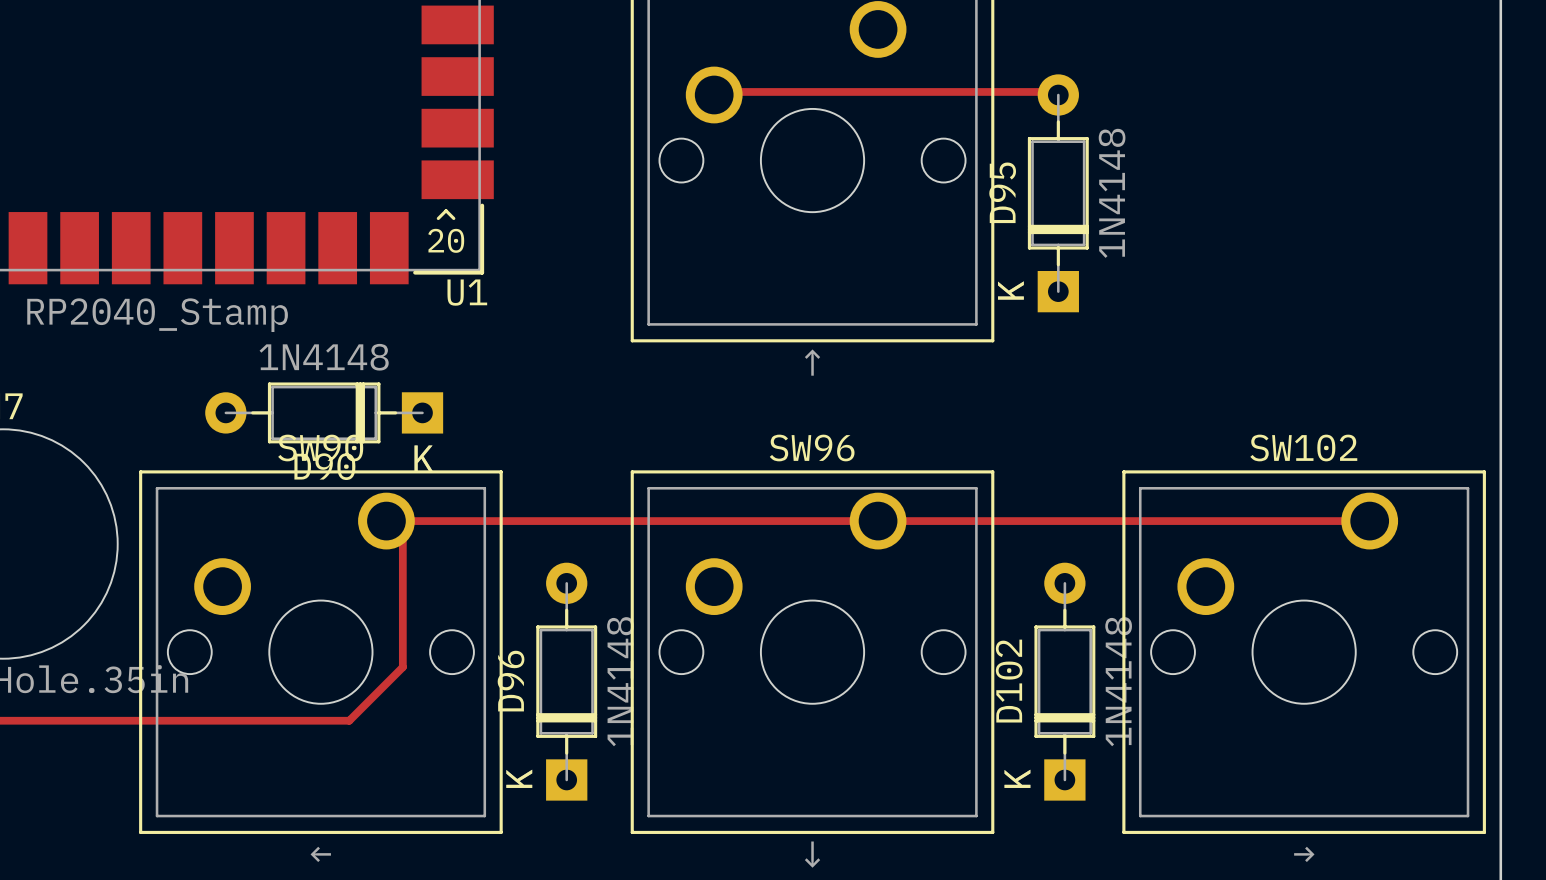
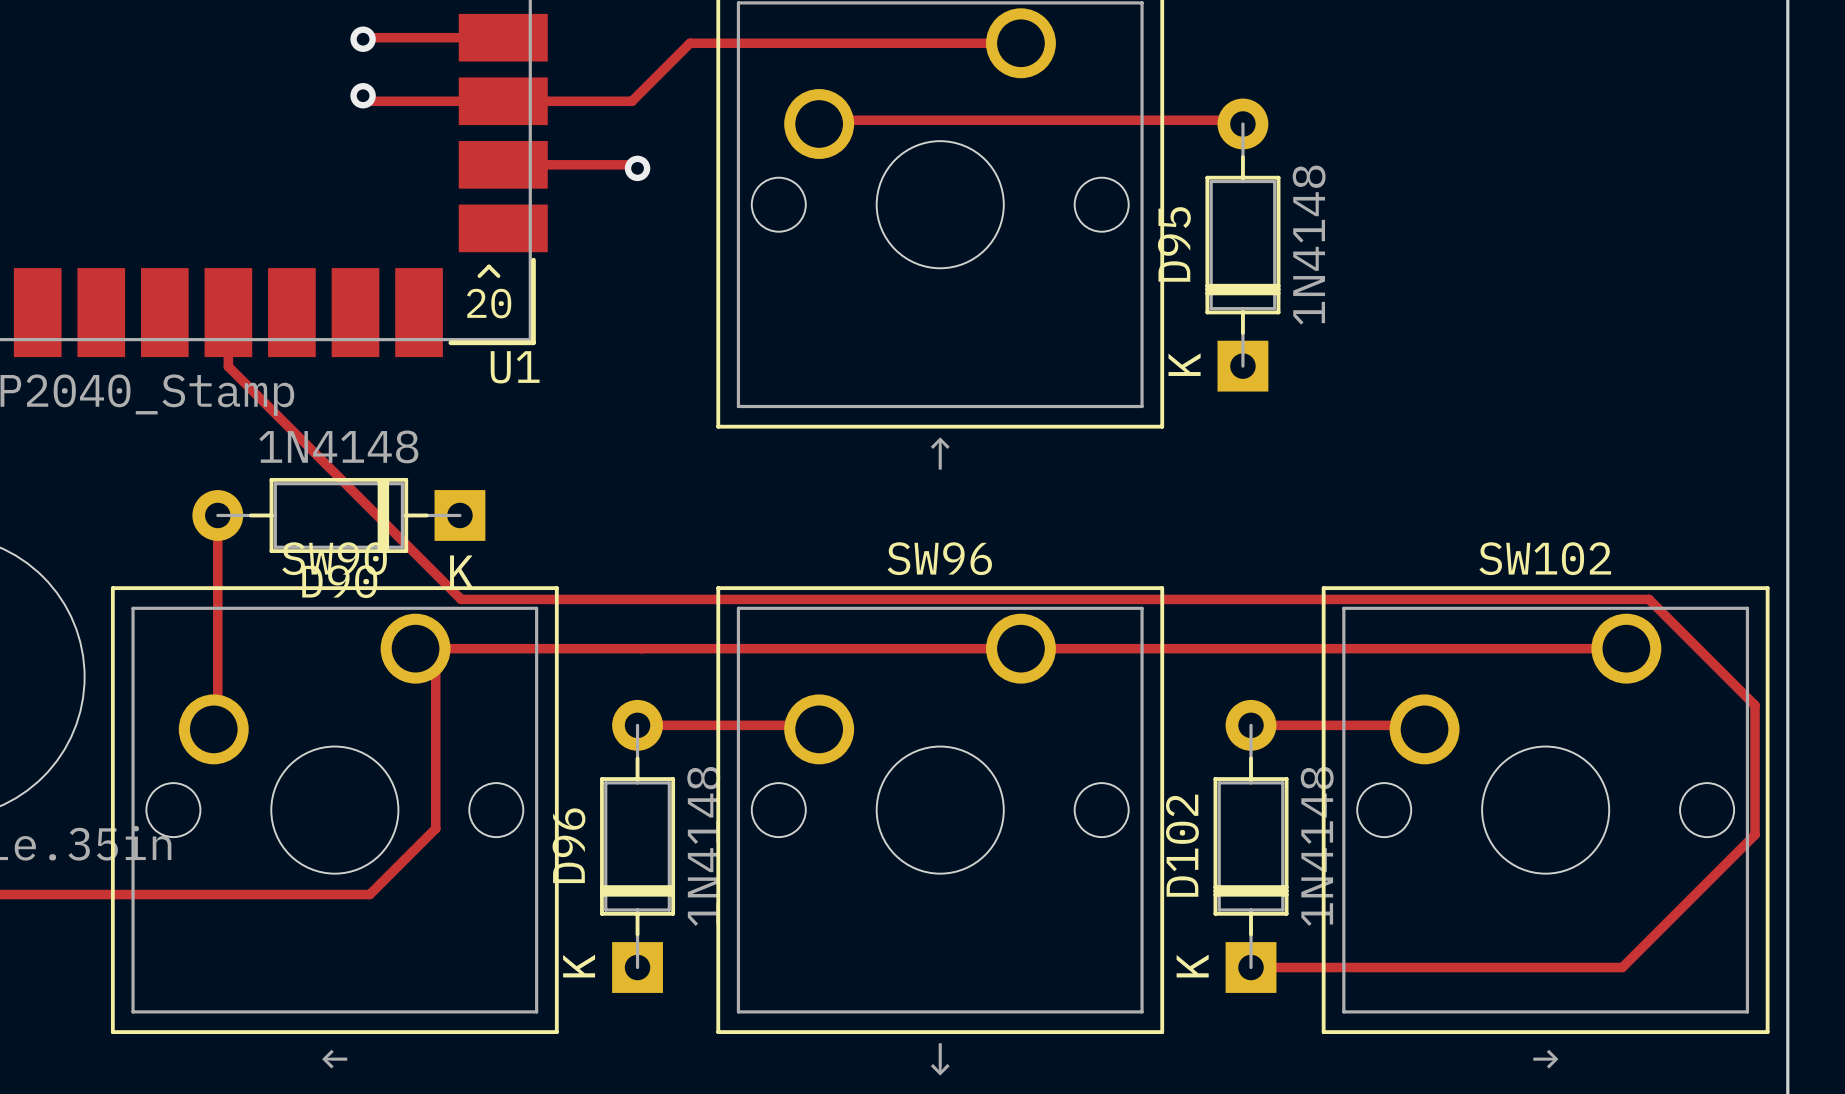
track: none -> (503, 37) (364, 37) (363, 39)
via: none -> (363, 39)
track: none -> (1020, 43) (690, 43) (632, 101) (368, 101) (363, 95)
via: none -> (363, 95)
track: none -> (503, 164) (633, 164) (637, 168)
via: none -> (637, 168)
track: none -> (228, 312) (228, 366) (461, 599) (1649, 599) (1754, 705) (1754, 834) (1622, 967) (1251, 967)
track: none -> (217, 515) (217, 725) (213, 729)
track: none -> (637, 725) (815, 725) (819, 729)
track: none -> (1251, 725) (1420, 725) (1424, 729)

